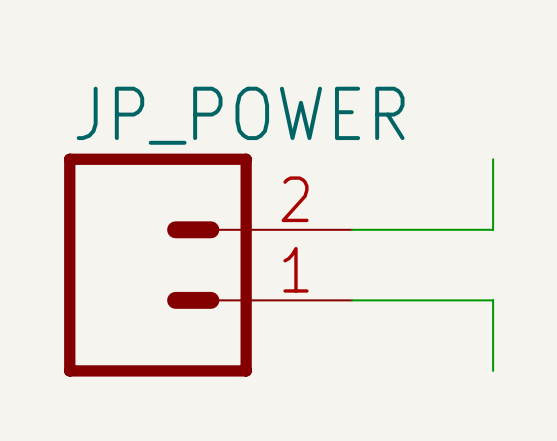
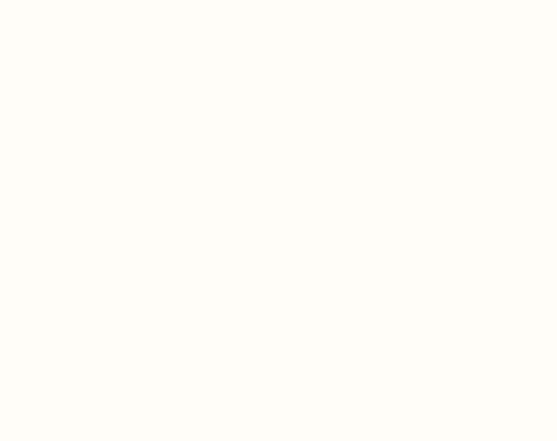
wire: (493, 159) (493, 229) (351, 229) -> none
JP_POWER: (208, 265) -> none
wire: (351, 300) (493, 300) (493, 370) -> none

